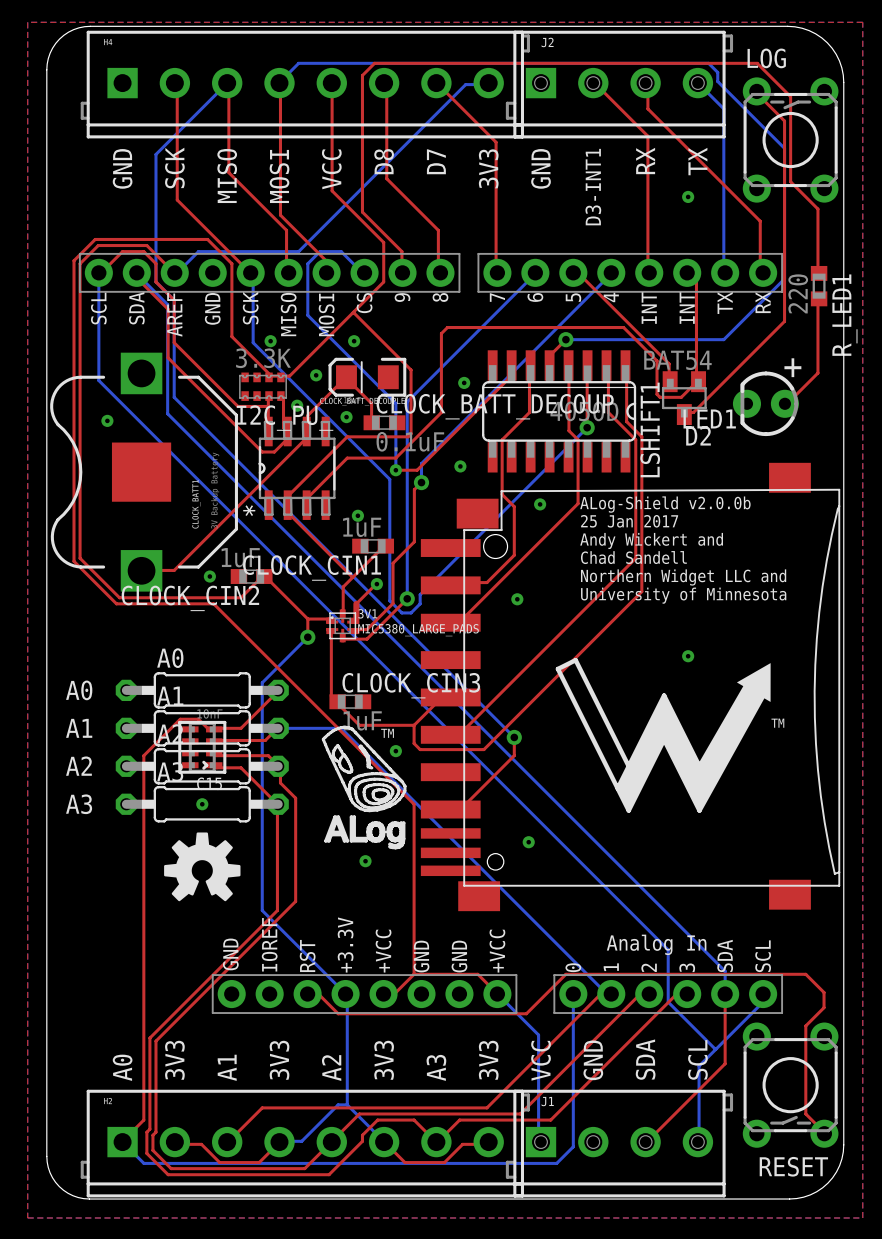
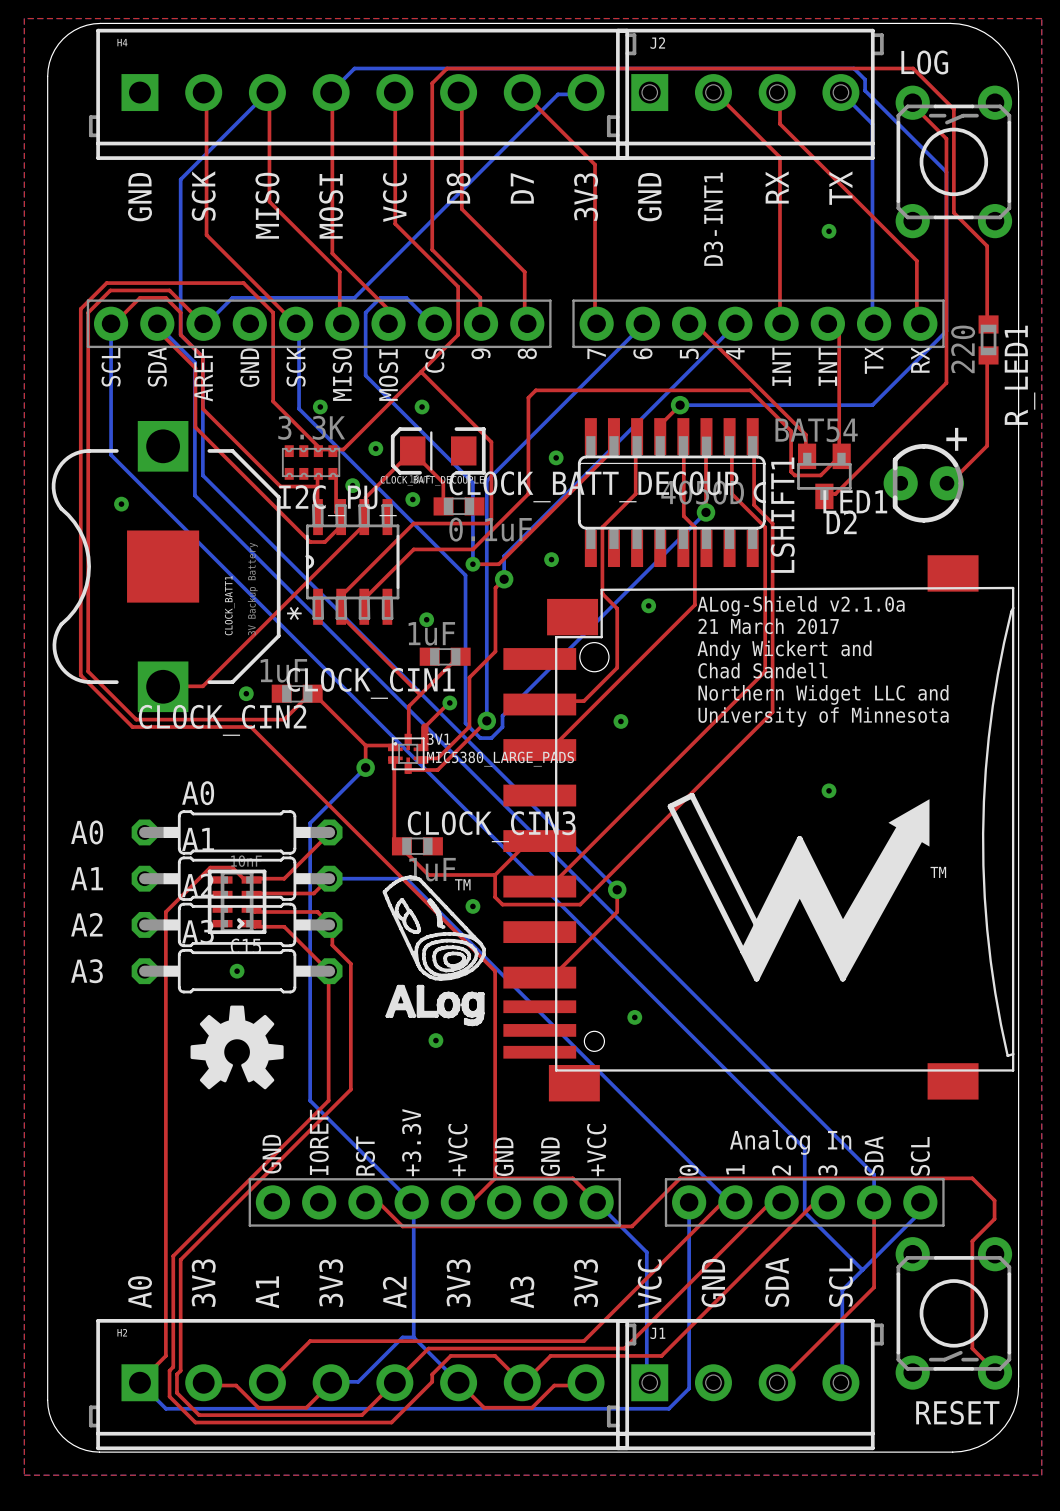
text: ALog-Shield v2.0.0b (665, 504) -> ALog-Shield v2.1.0a (801, 606)
text: 25 Jan 2017 (629, 521) -> 21 March 2017 (768, 626)

